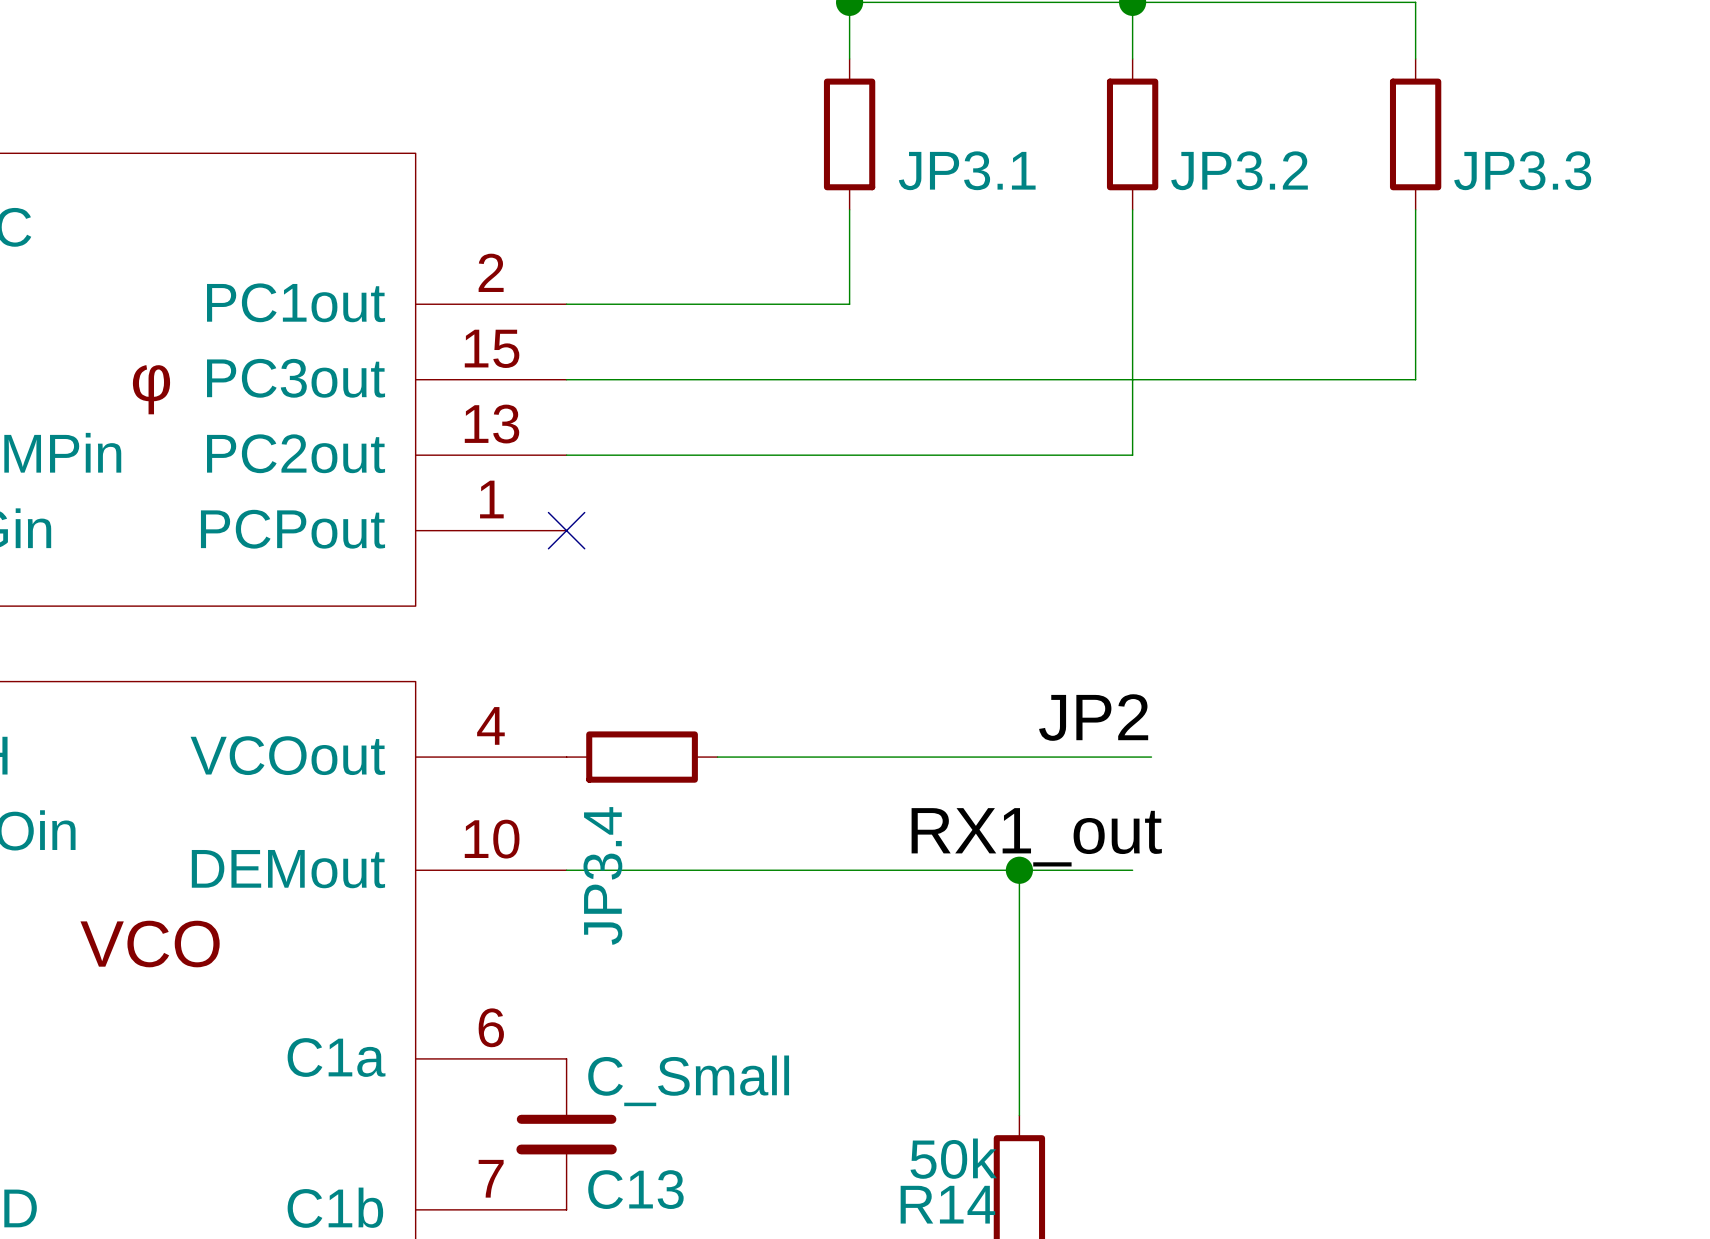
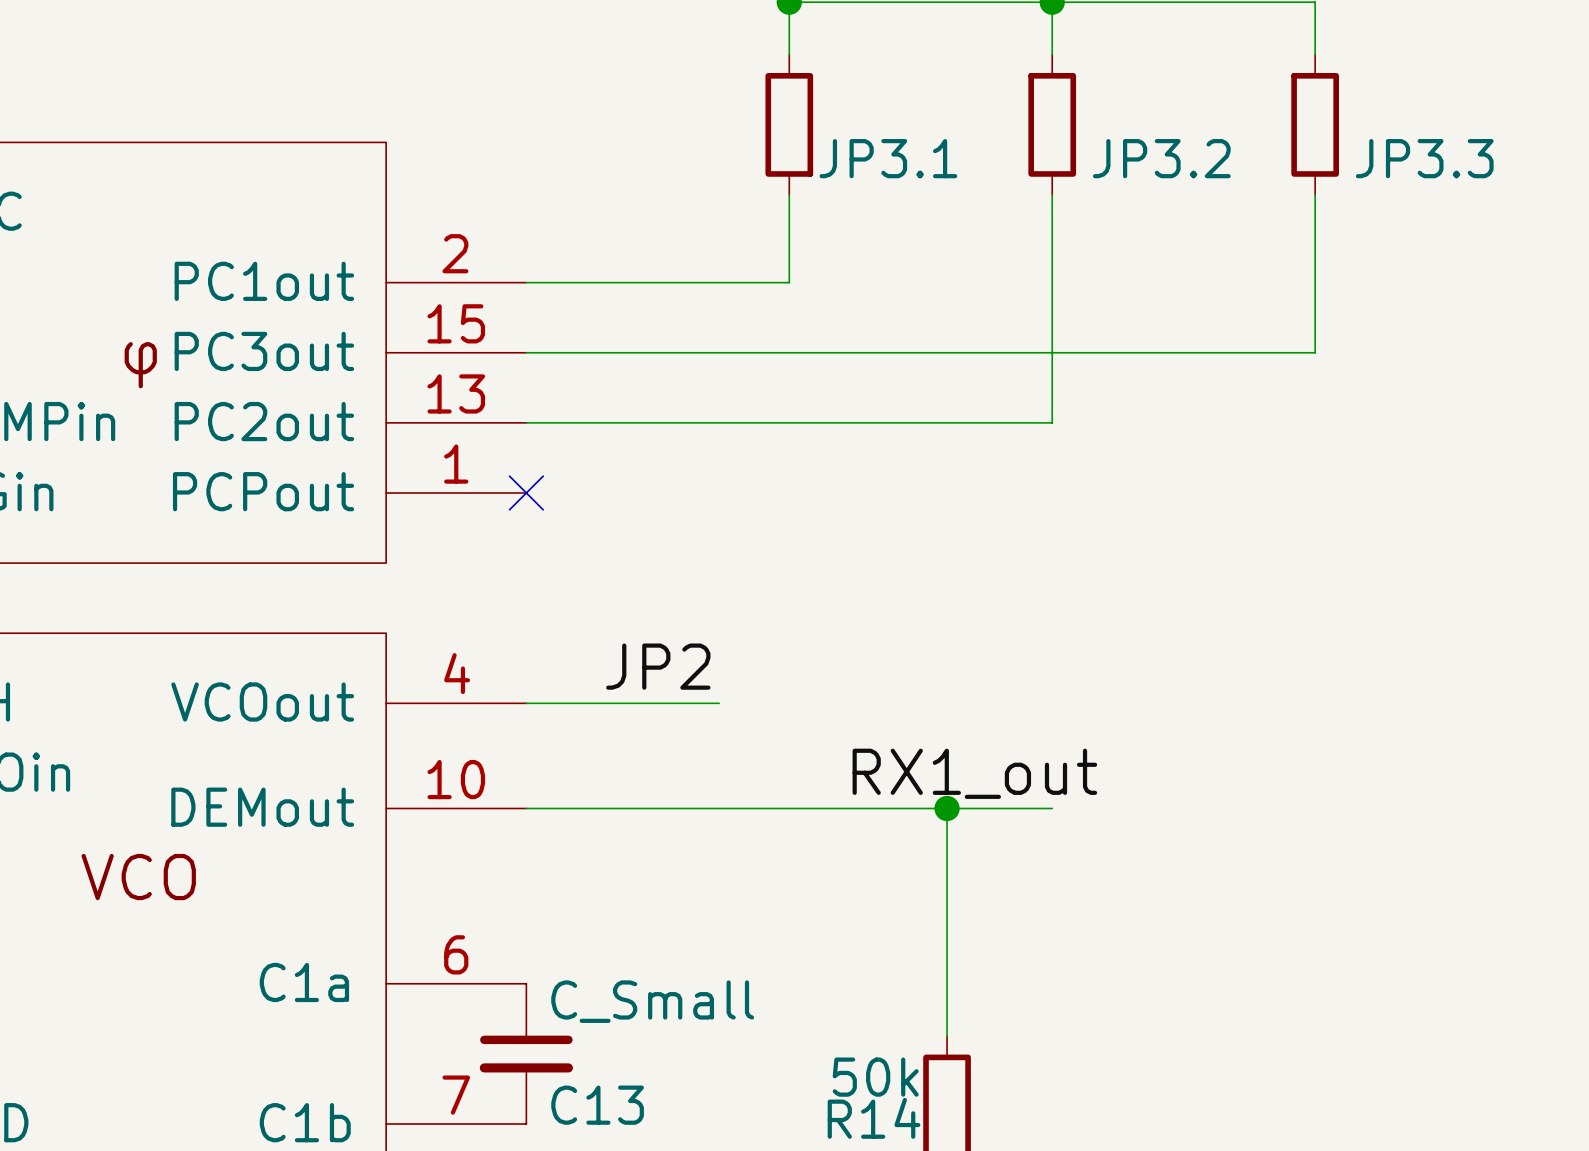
label position: JP2 (1093, 717) -> JP2 (658, 666)
wire: none -> (526, 703) (666, 703)
JP3.4: (642, 757) -> none
wire: (774, 757) (1151, 757) -> none

